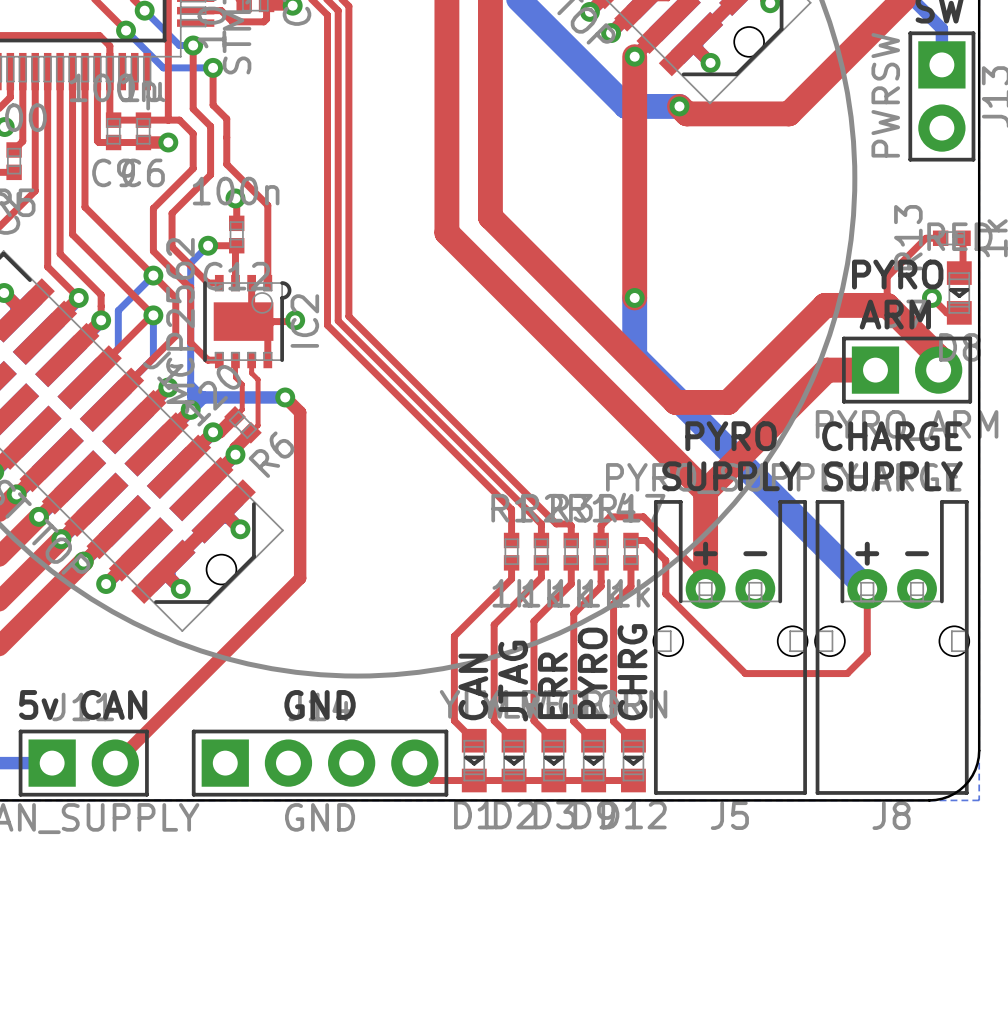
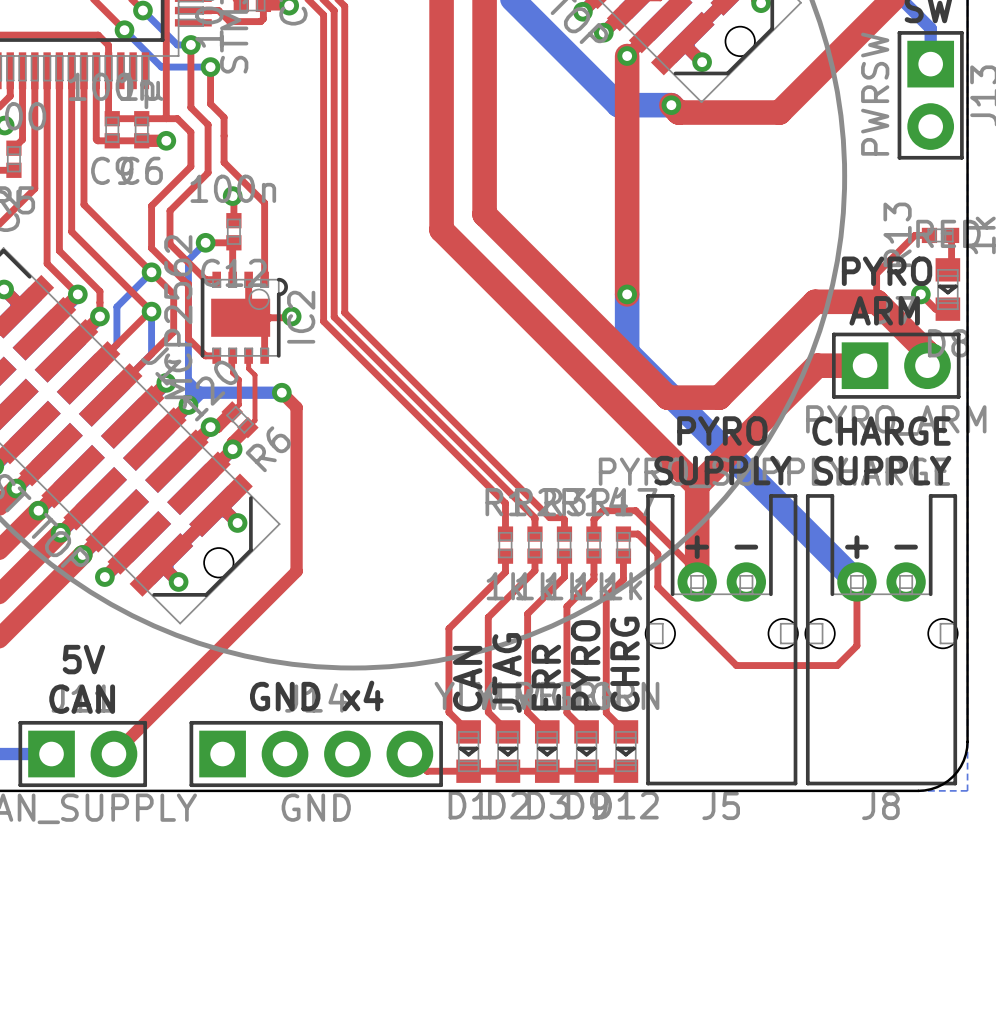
text: none -> 5V (83, 659)
text: 5v CAN (83, 704) -> CAN (82, 699)
text: GND (320, 704) -> GND x4 (316, 695)

